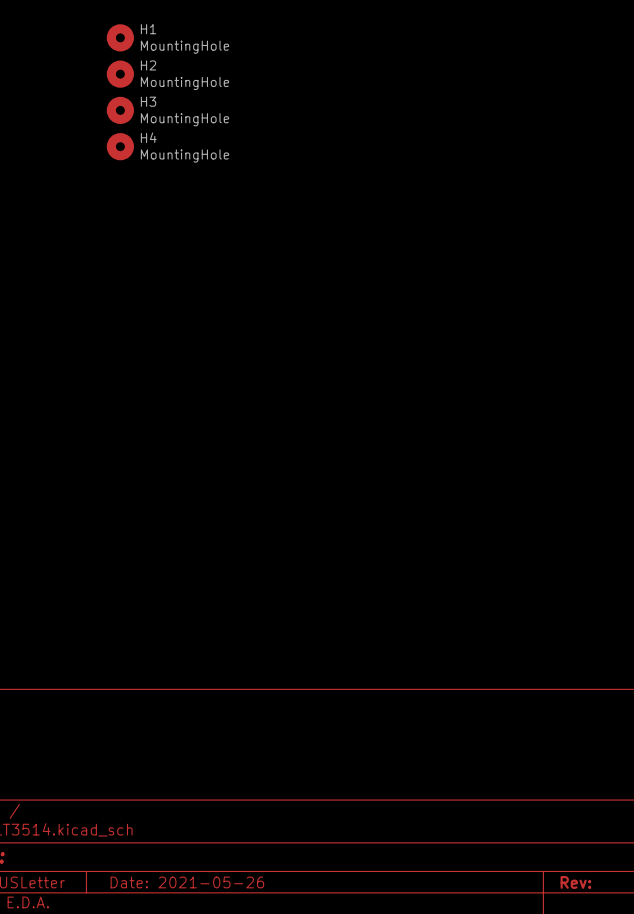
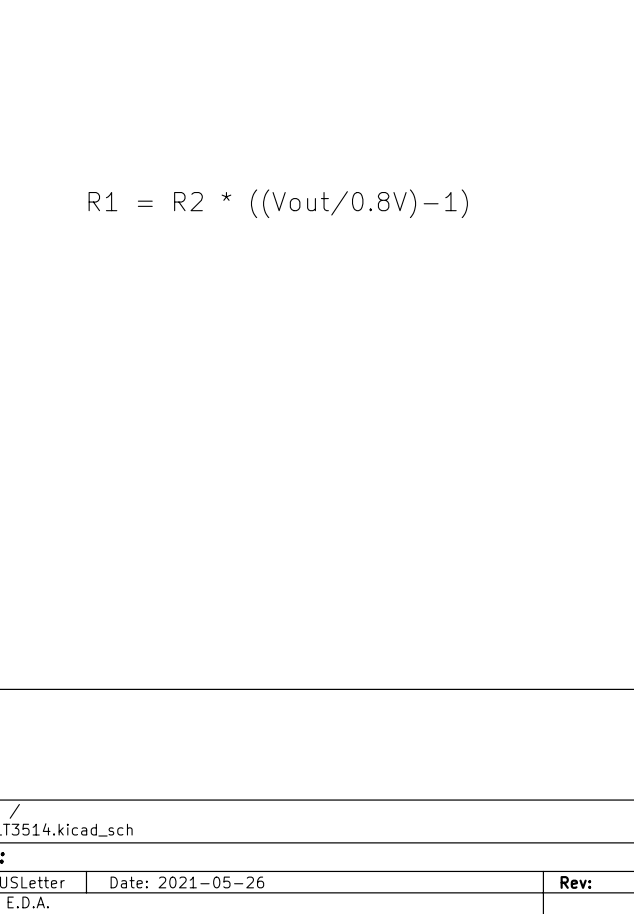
H1: MountingHole (120, 37) -> none
H2: MountingHole (120, 74) -> none
H3: MountingHole (120, 110) -> none
H4: MountingHole (120, 146) -> none
text: none -> R1 = R2 * ((Vout/0.8V)-1) (278, 203)

